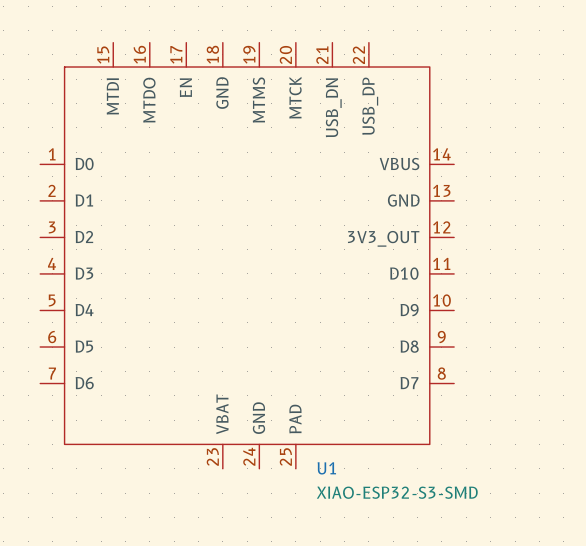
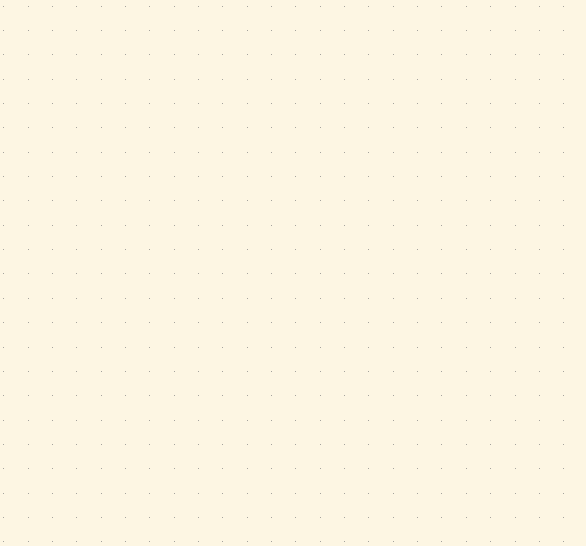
U1: XIAO-ESP32-S3-SMD (247, 255) -> none

